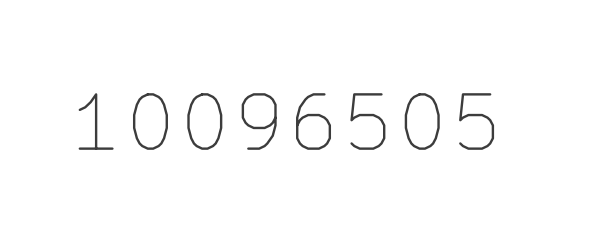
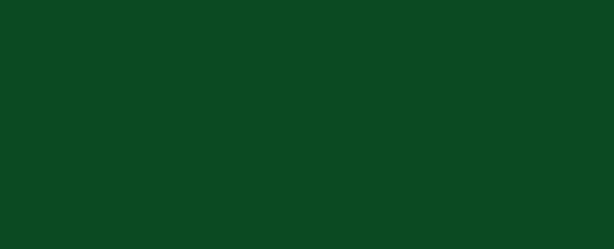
text: 10096505 (286, 121) -> none

